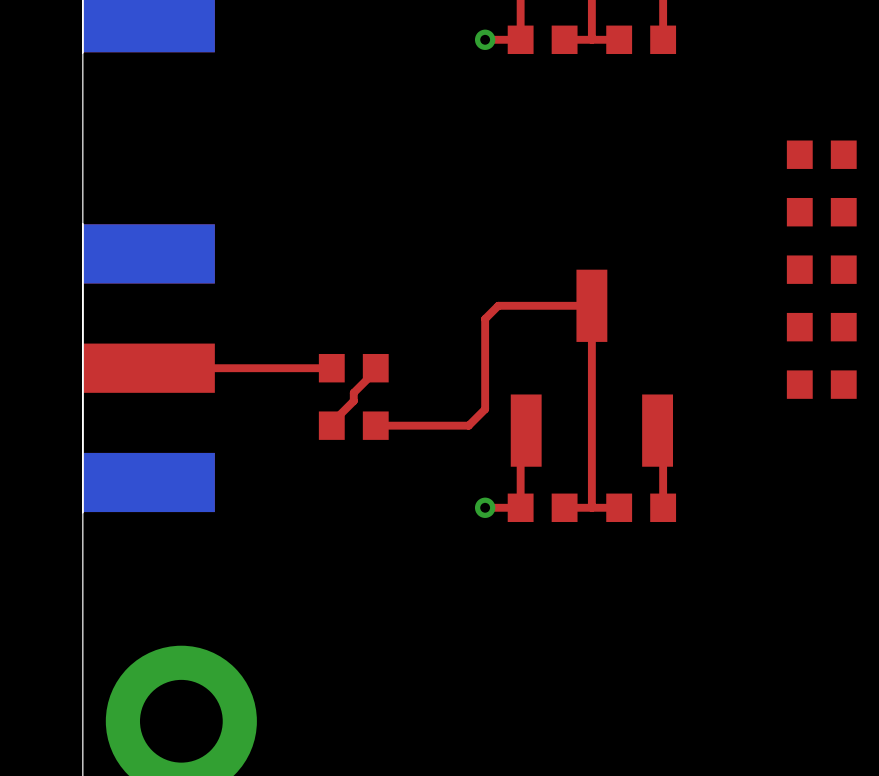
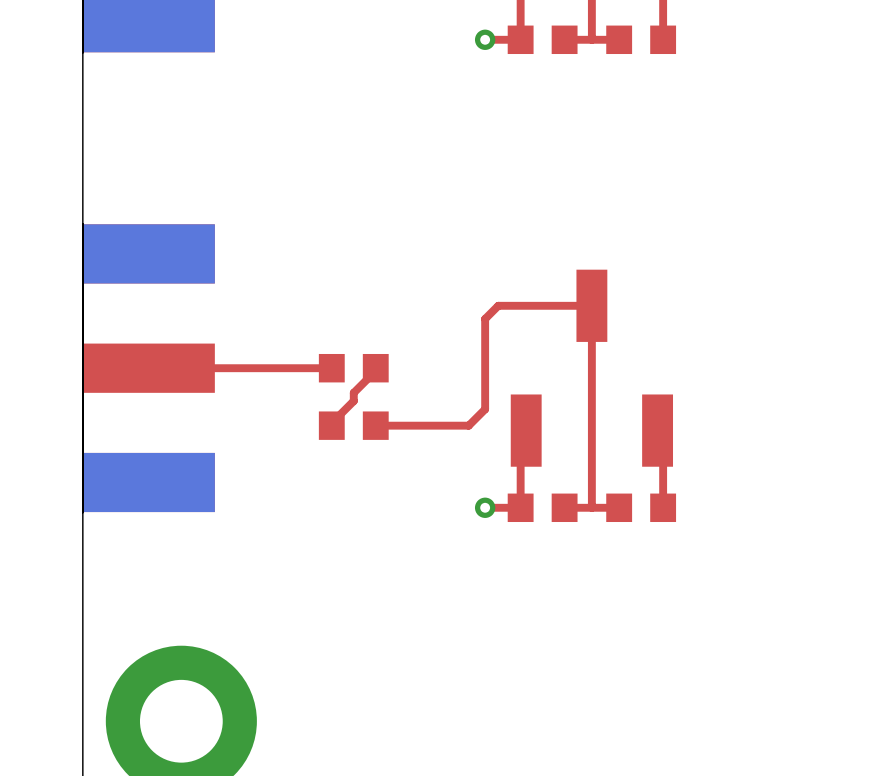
part: (821, 154) -> none
part: (821, 212) -> none
part: (821, 269) -> none
part: (821, 327) -> none
part: (821, 384) -> none

